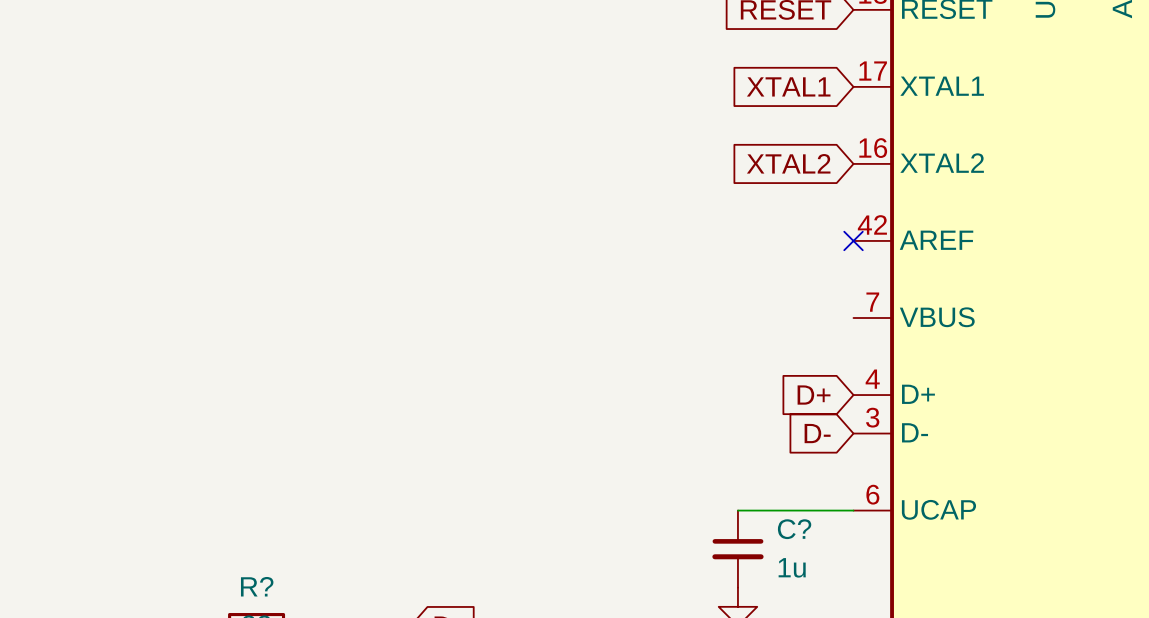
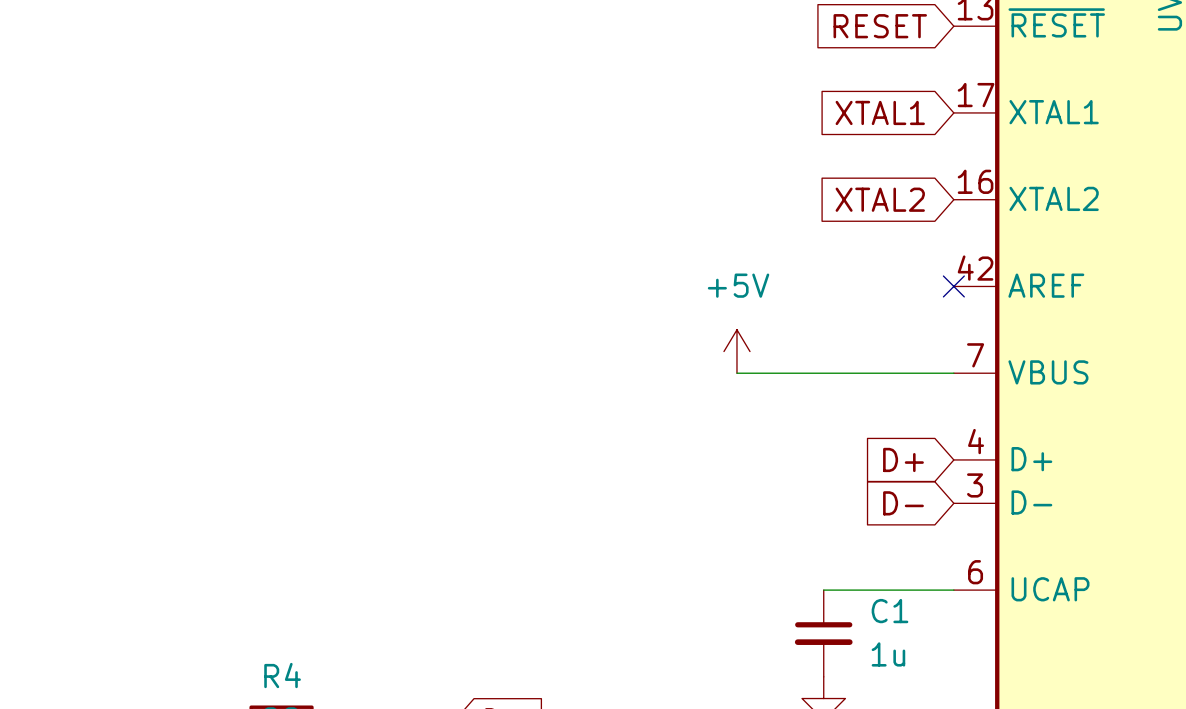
power symbol: none -> +5V (736, 351)
wire: none -> (736, 373) (953, 373)
C? name: C? (794, 529) -> C1 (889, 611)
R? name: R? (257, 586) -> R4 (282, 675)

